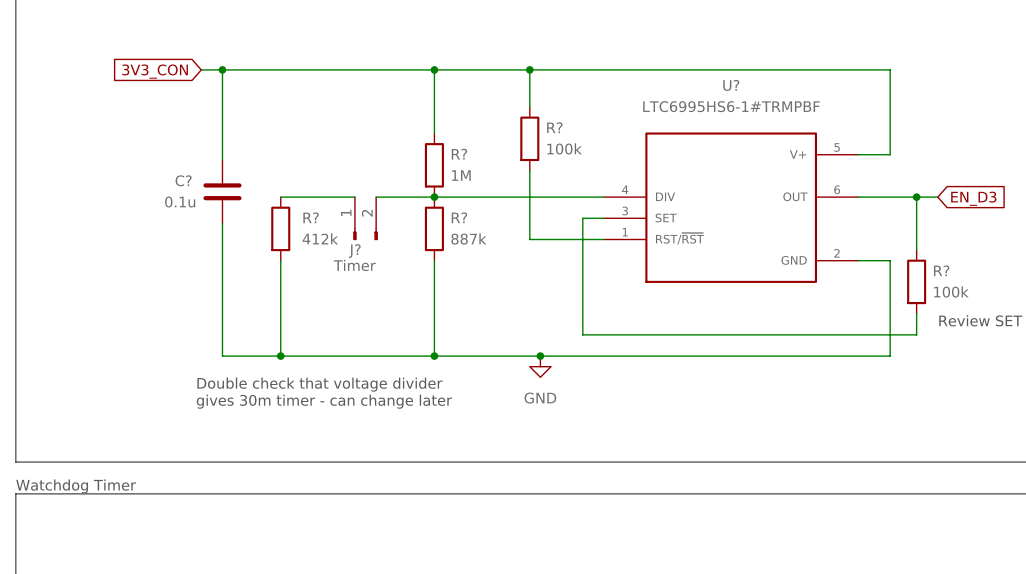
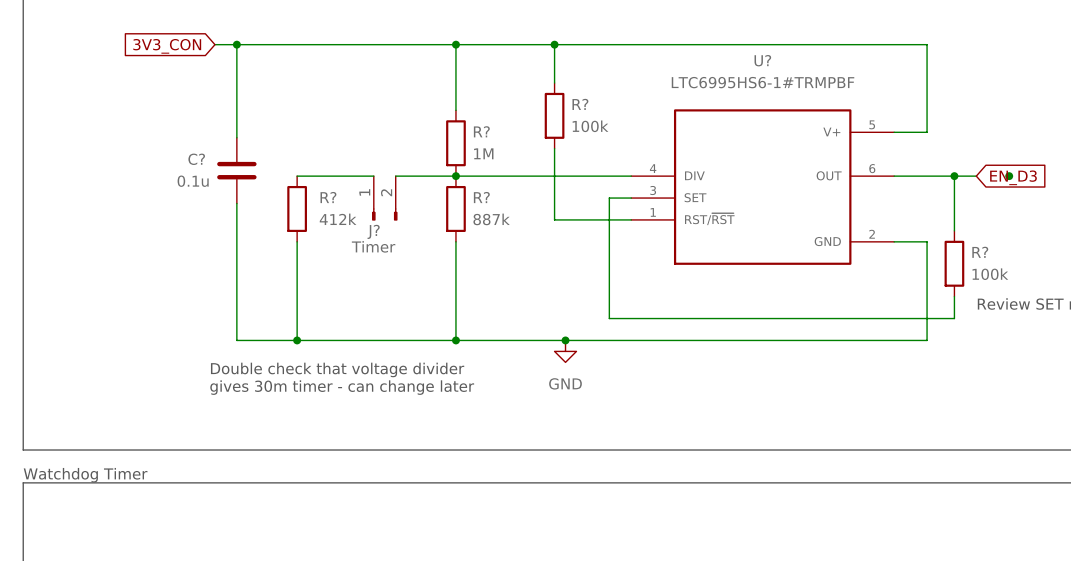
junction: none -> (1009, 176)

